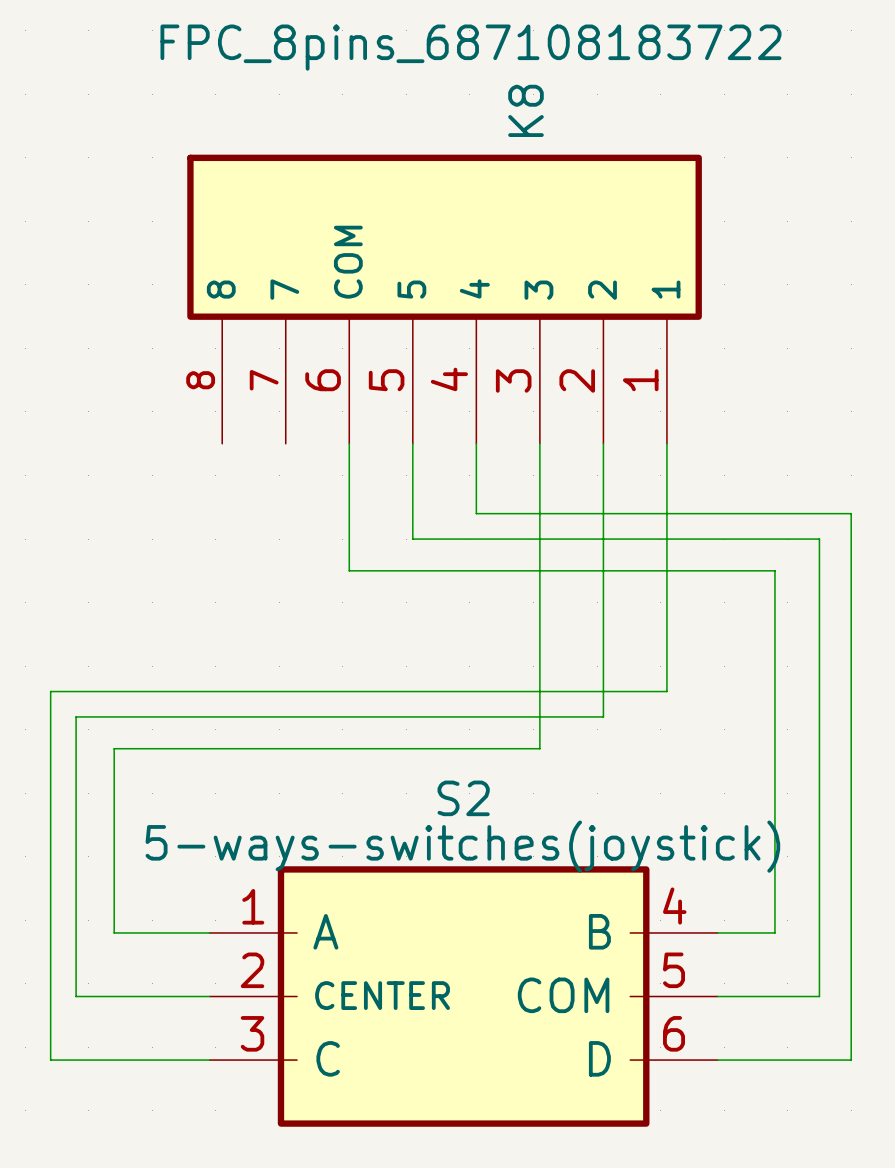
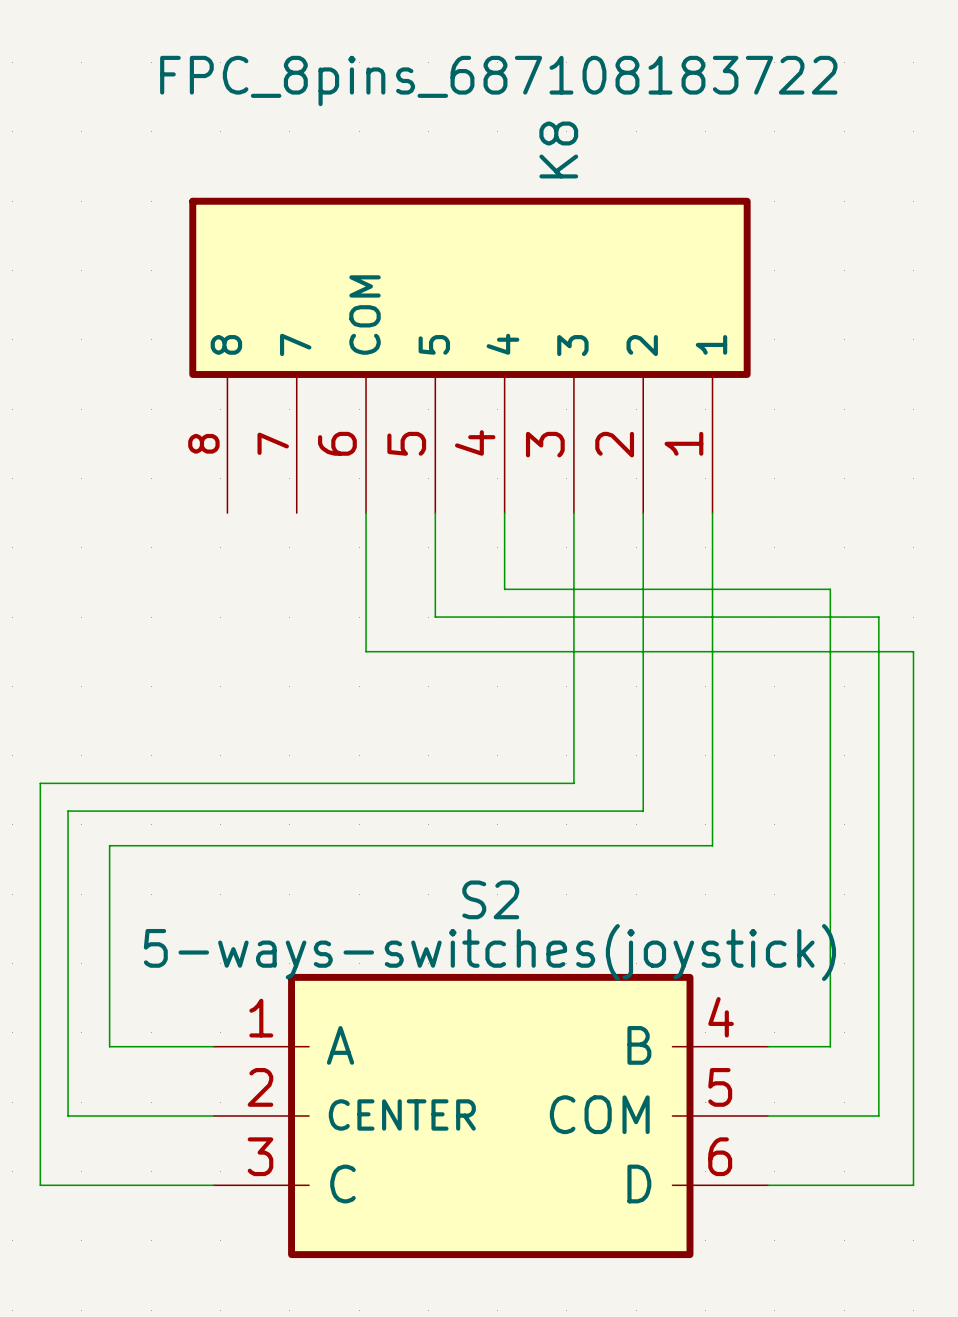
wire: (774, 513) (851, 513) (851, 570) -> (830, 589) (830, 651) (913, 651)
wire: (666, 691) (539, 691) (539, 748) -> (712, 783) (712, 845) (573, 845)

